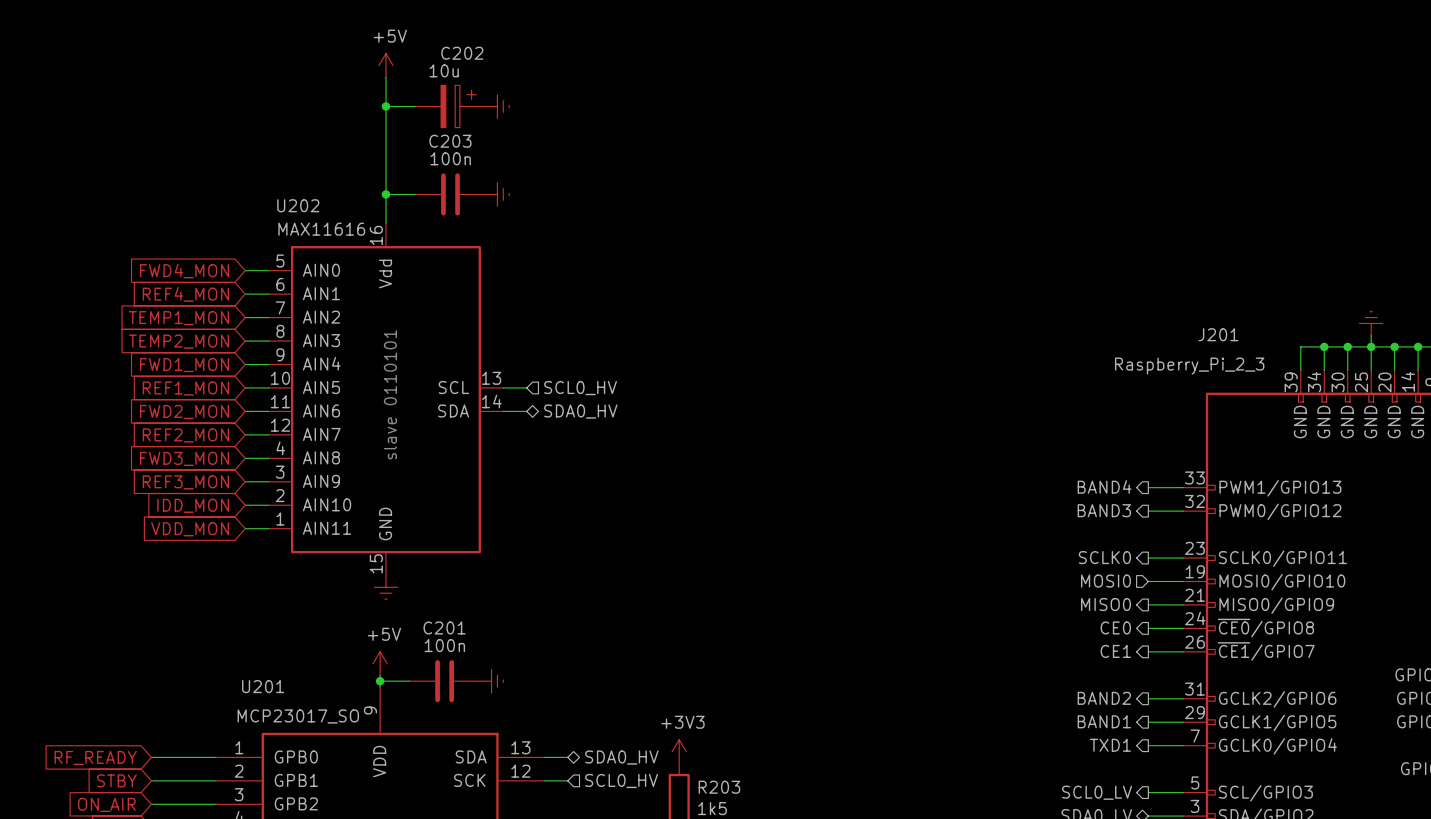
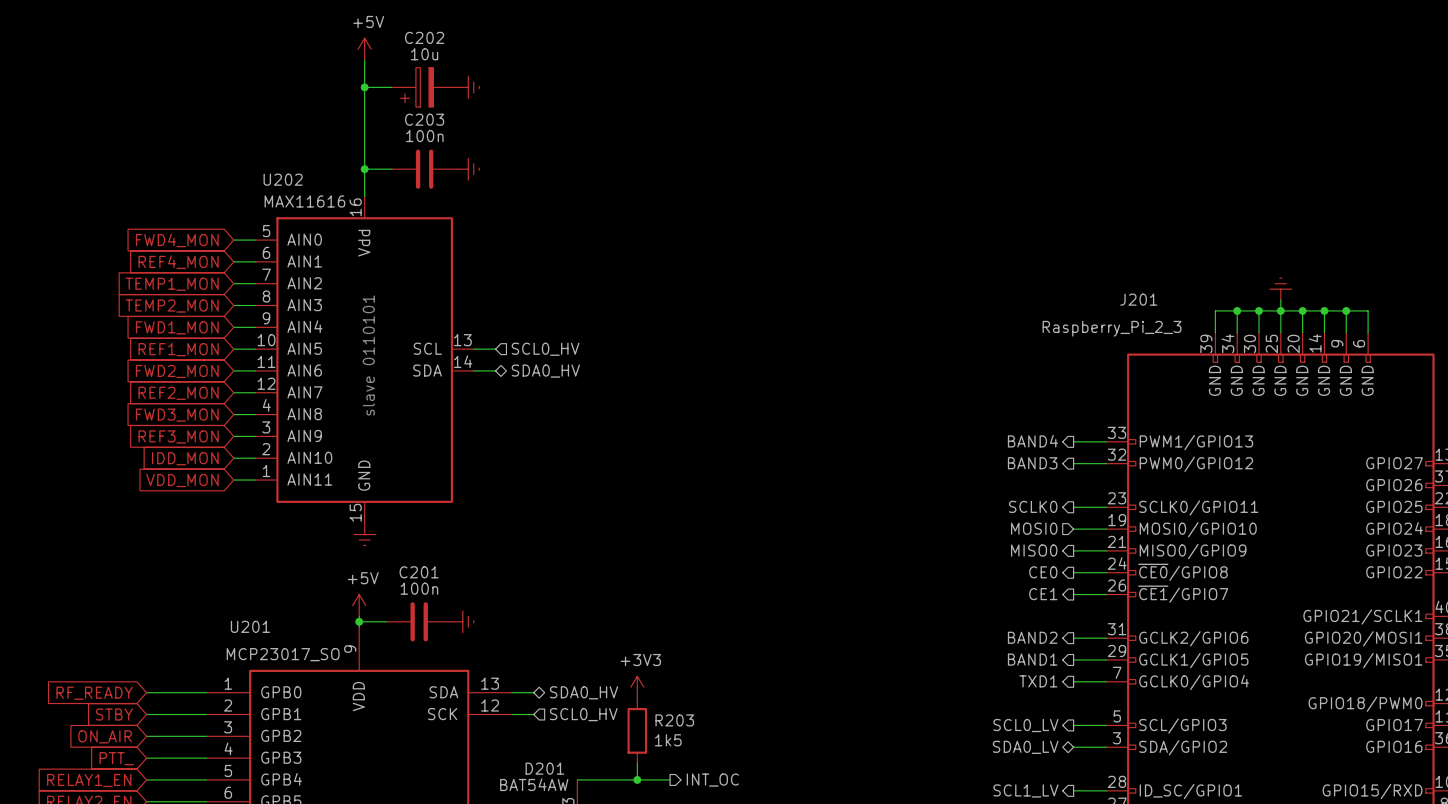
C202 rotation: 0° (458, 106) -> 180° (417, 87)

